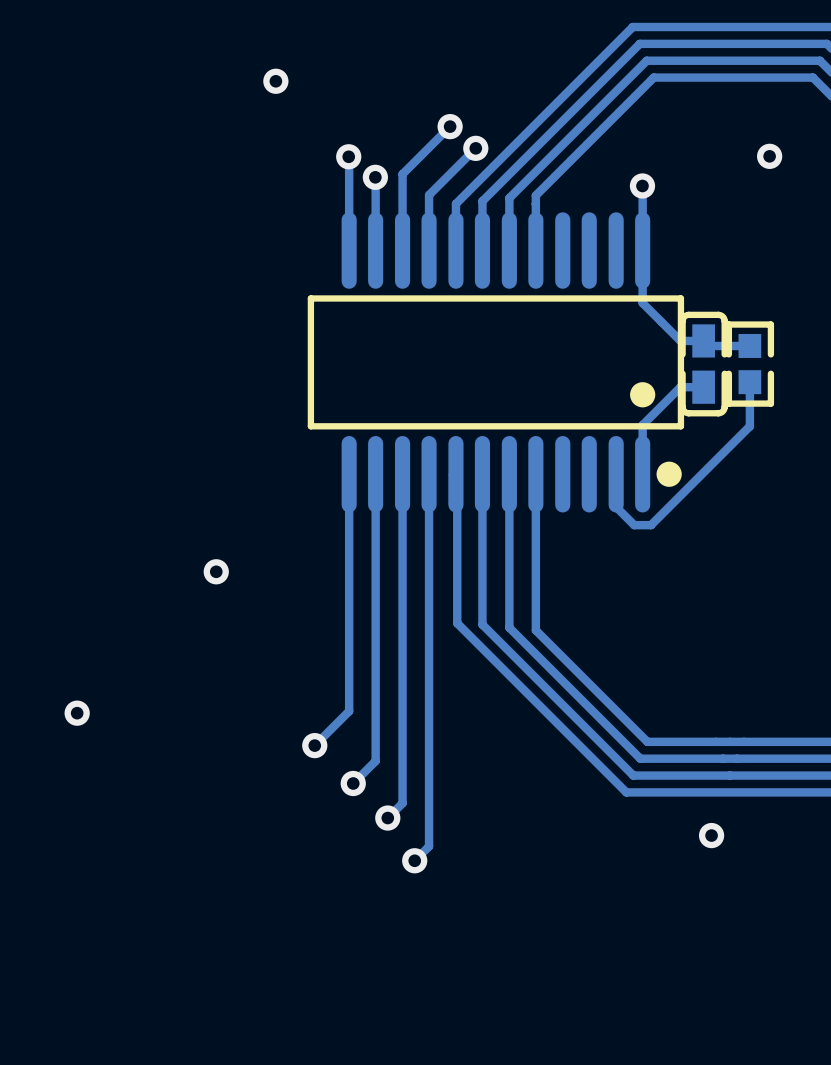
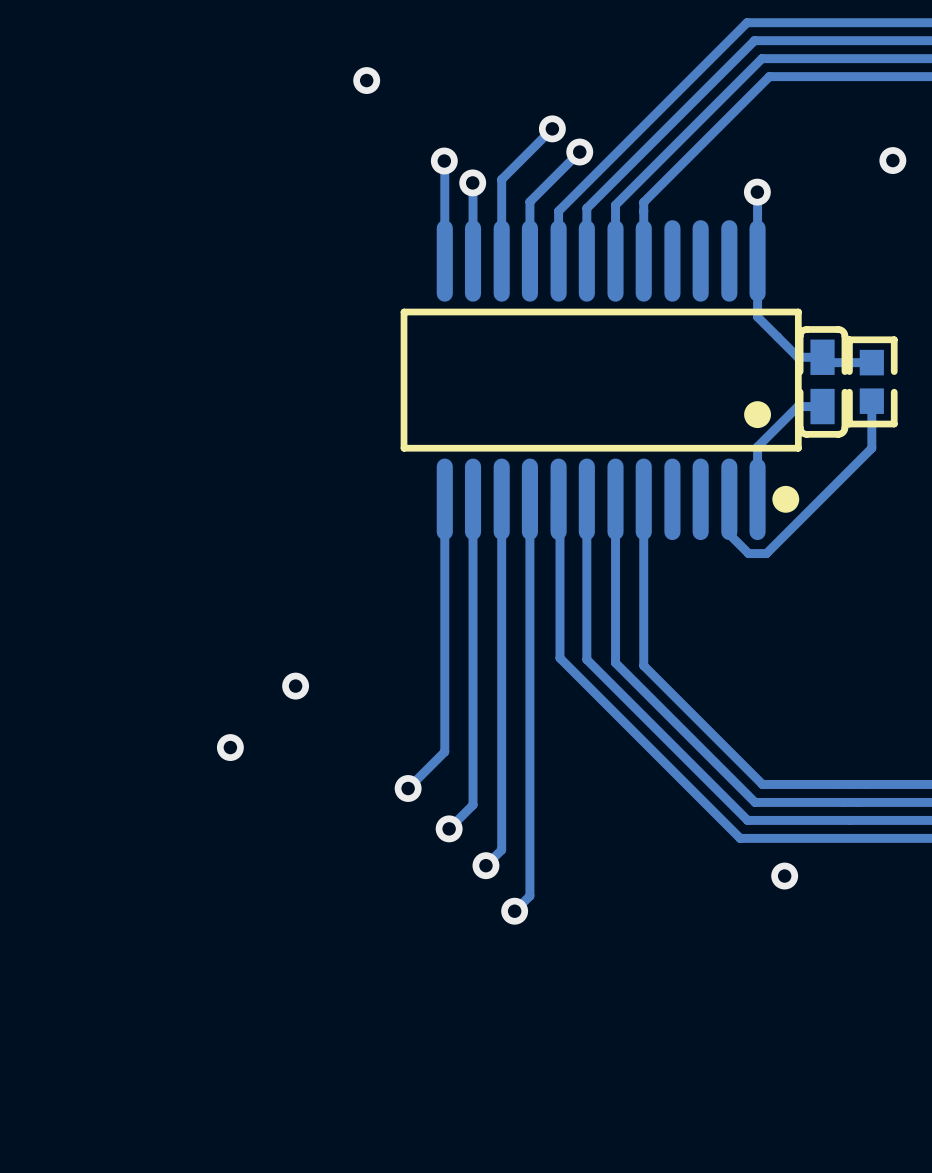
via: (216, 571) -> none
via: none -> (295, 686)
via position: (77, 713) -> (230, 747)
via position: (711, 835) -> (784, 876)

